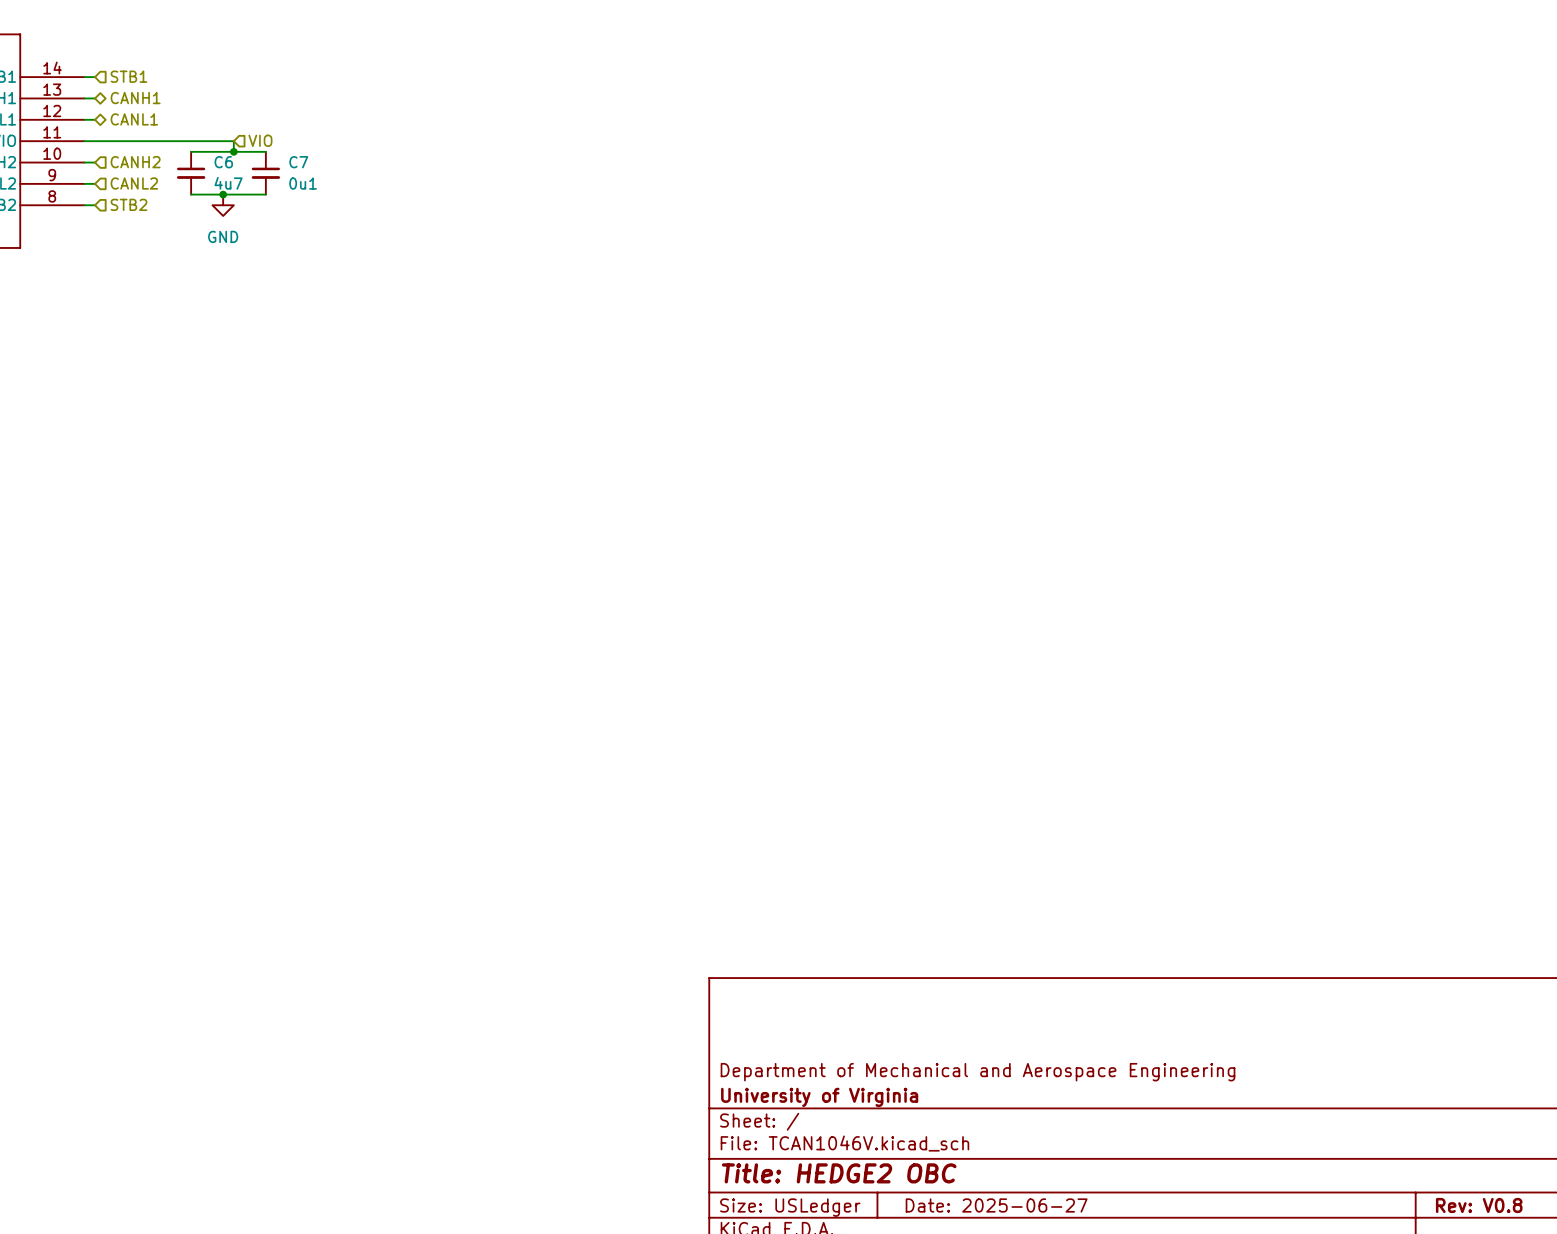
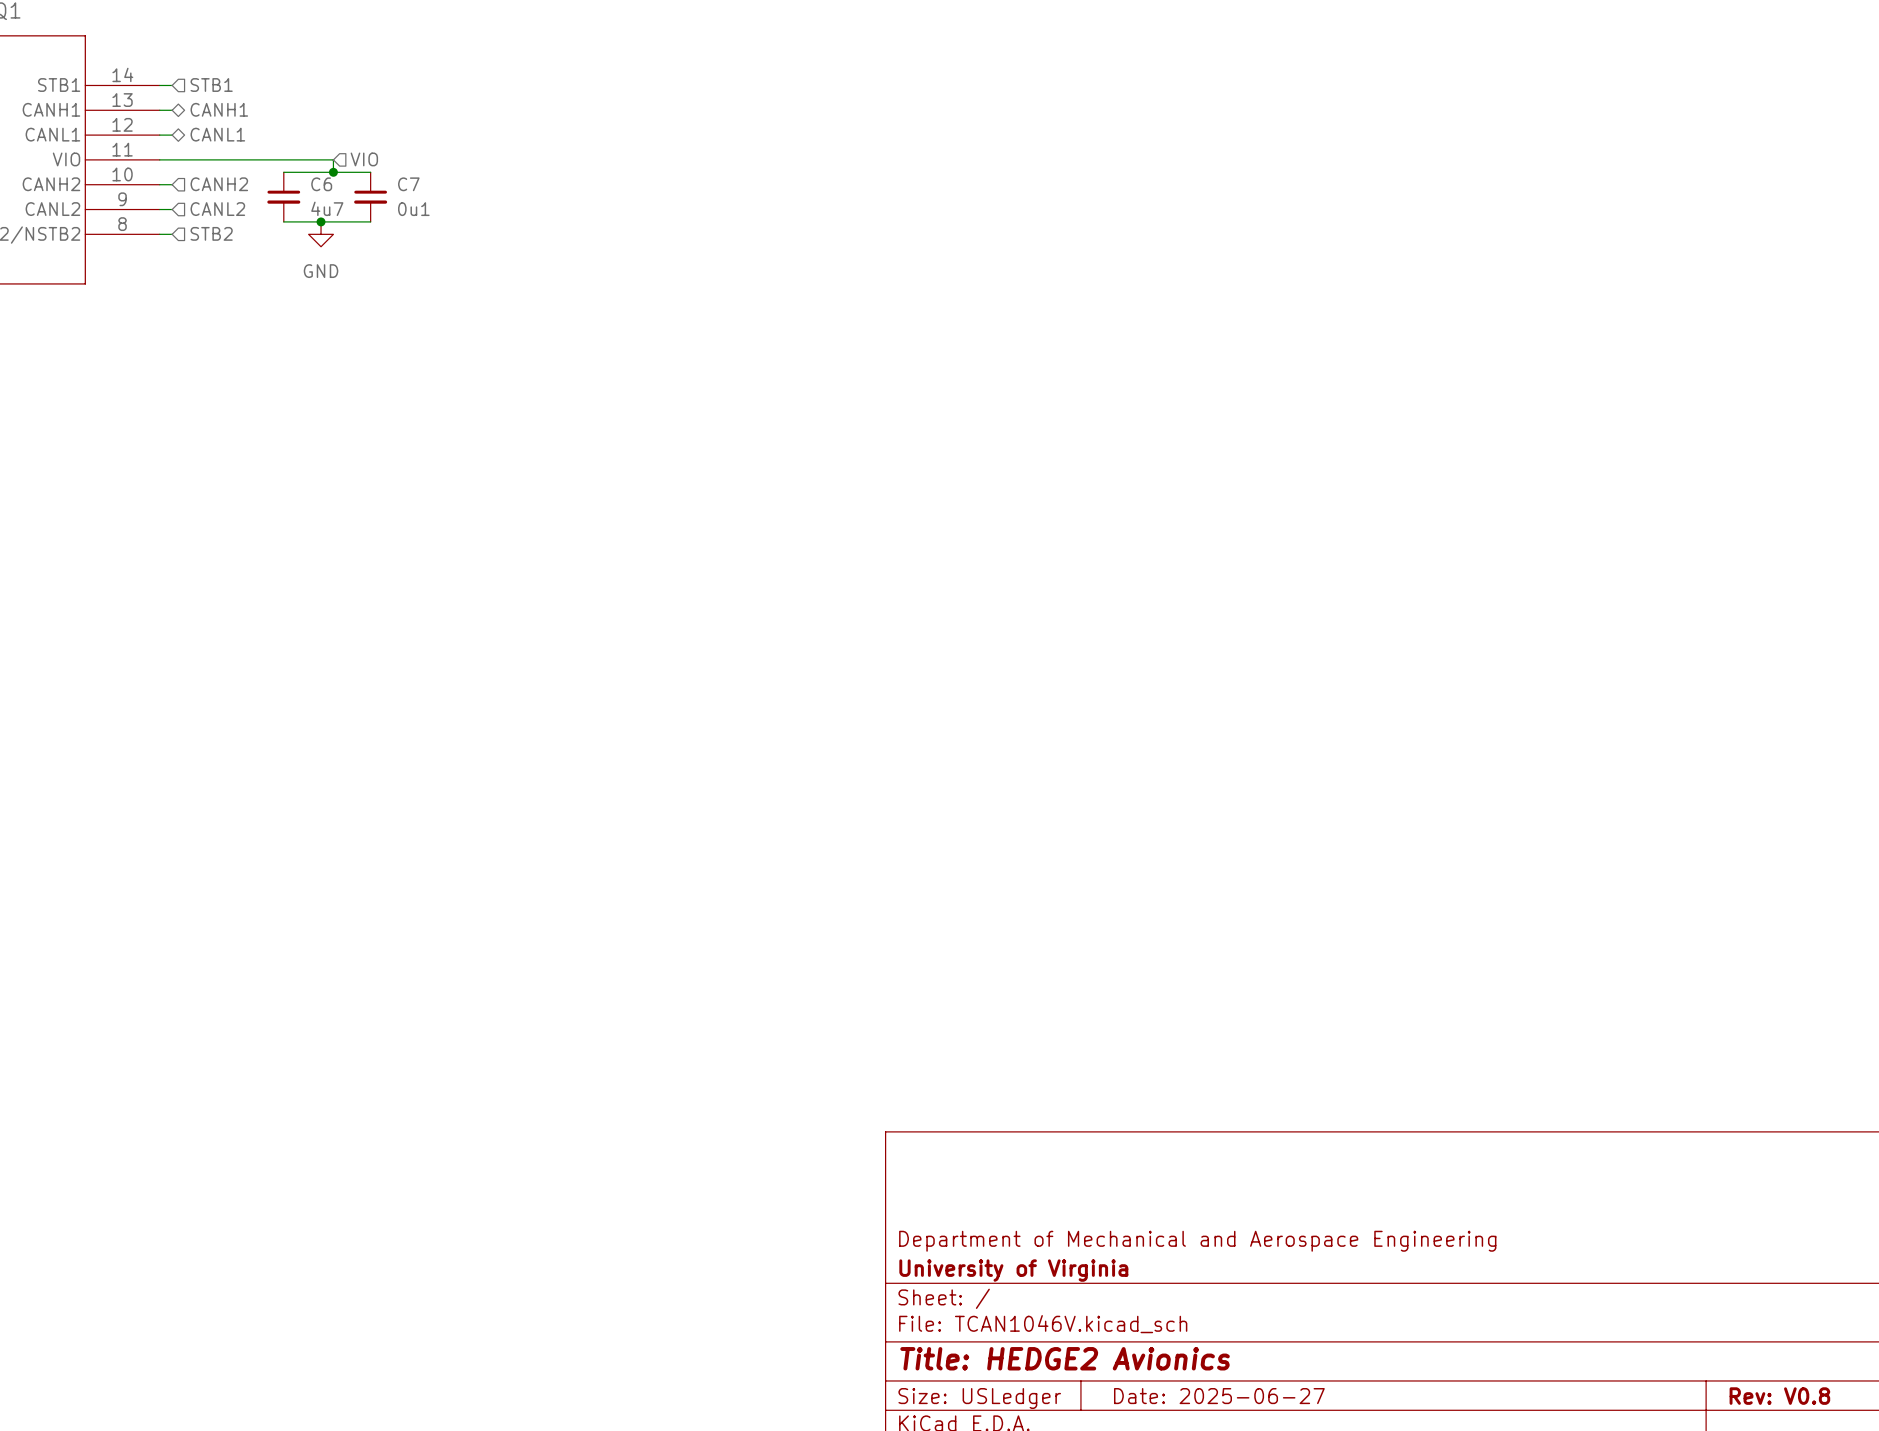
title block: Title: HEDGE2 OBC (839, 1173) -> Title: HEDGE2 Avionics (1065, 1358)

